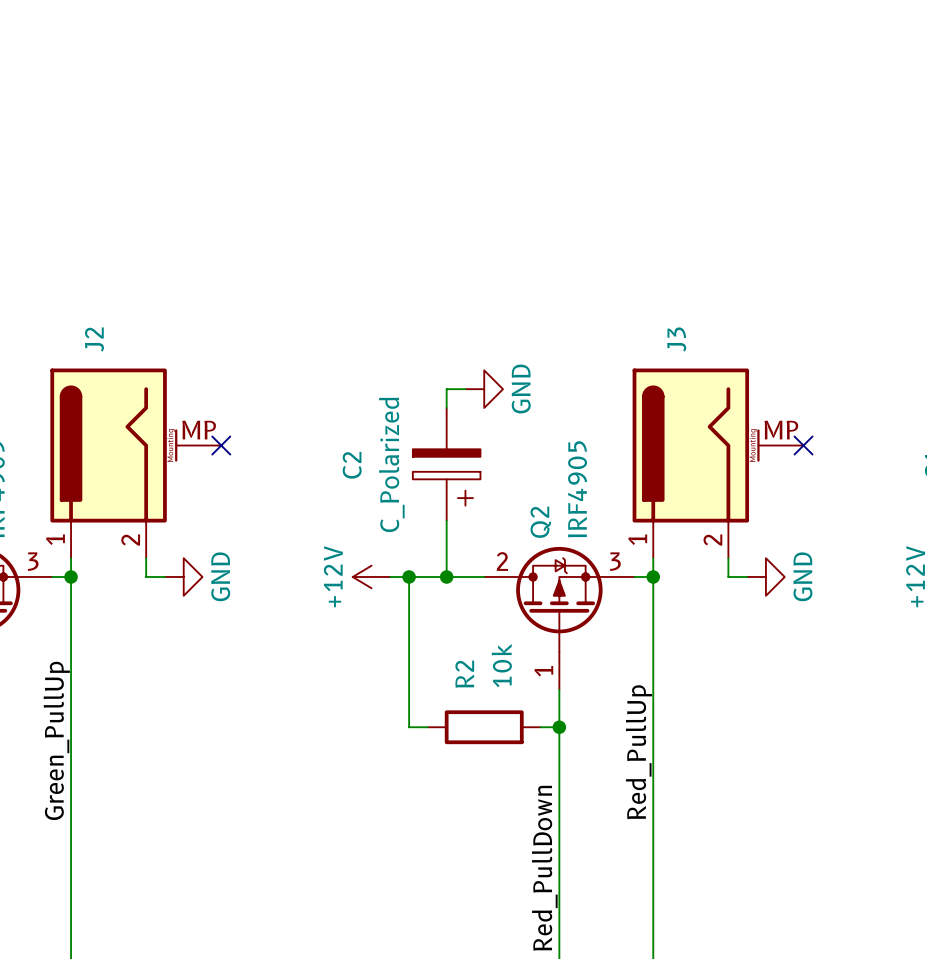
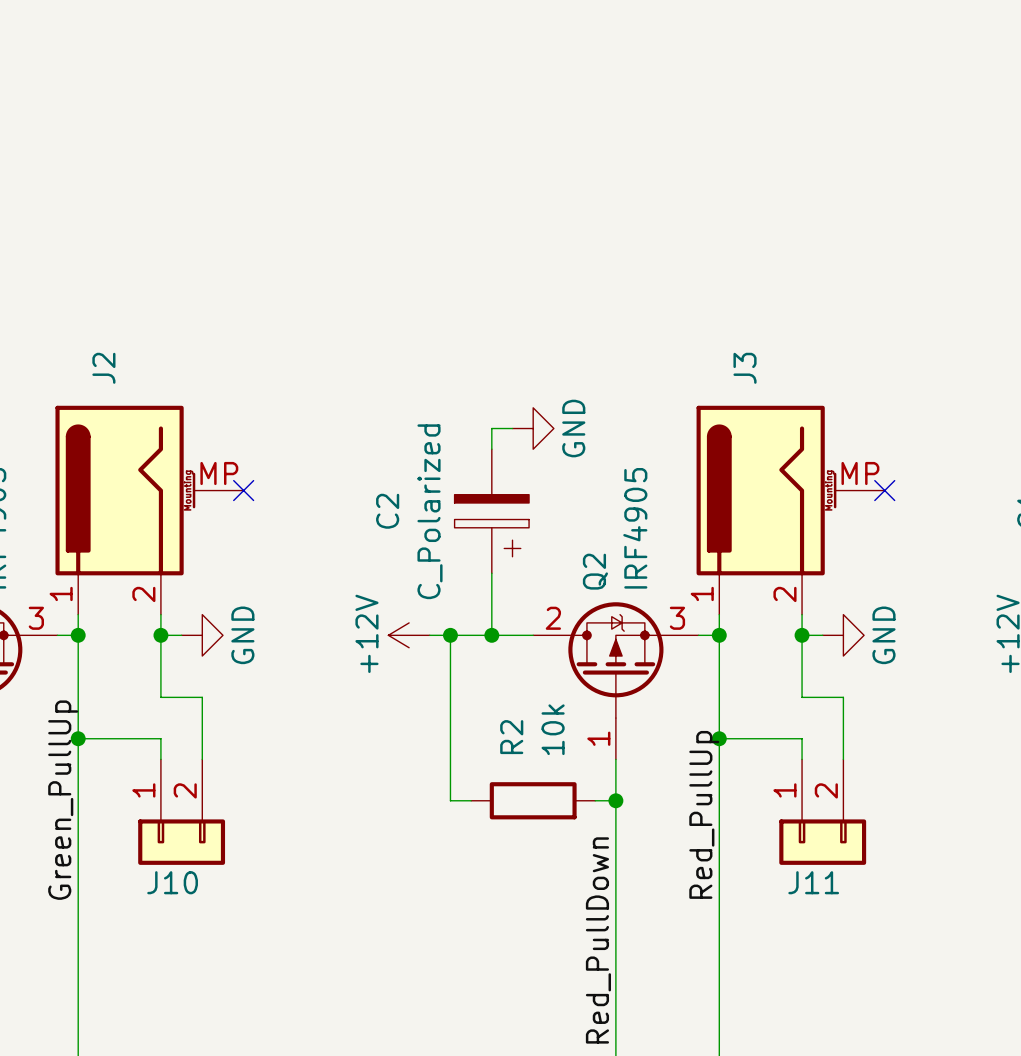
wire: none -> (160, 635) (160, 697) (202, 697) (202, 759)
junction: none -> (160, 635)
wire: none -> (802, 635) (802, 697) (843, 697) (843, 759)
junction: none -> (802, 635)
wire: none -> (78, 738) (160, 738) (160, 759)
junction: none -> (78, 738)
wire: none -> (719, 738) (802, 738) (802, 759)
junction: none -> (719, 738)
J10: none -> (181, 812)
J11: none -> (822, 812)

